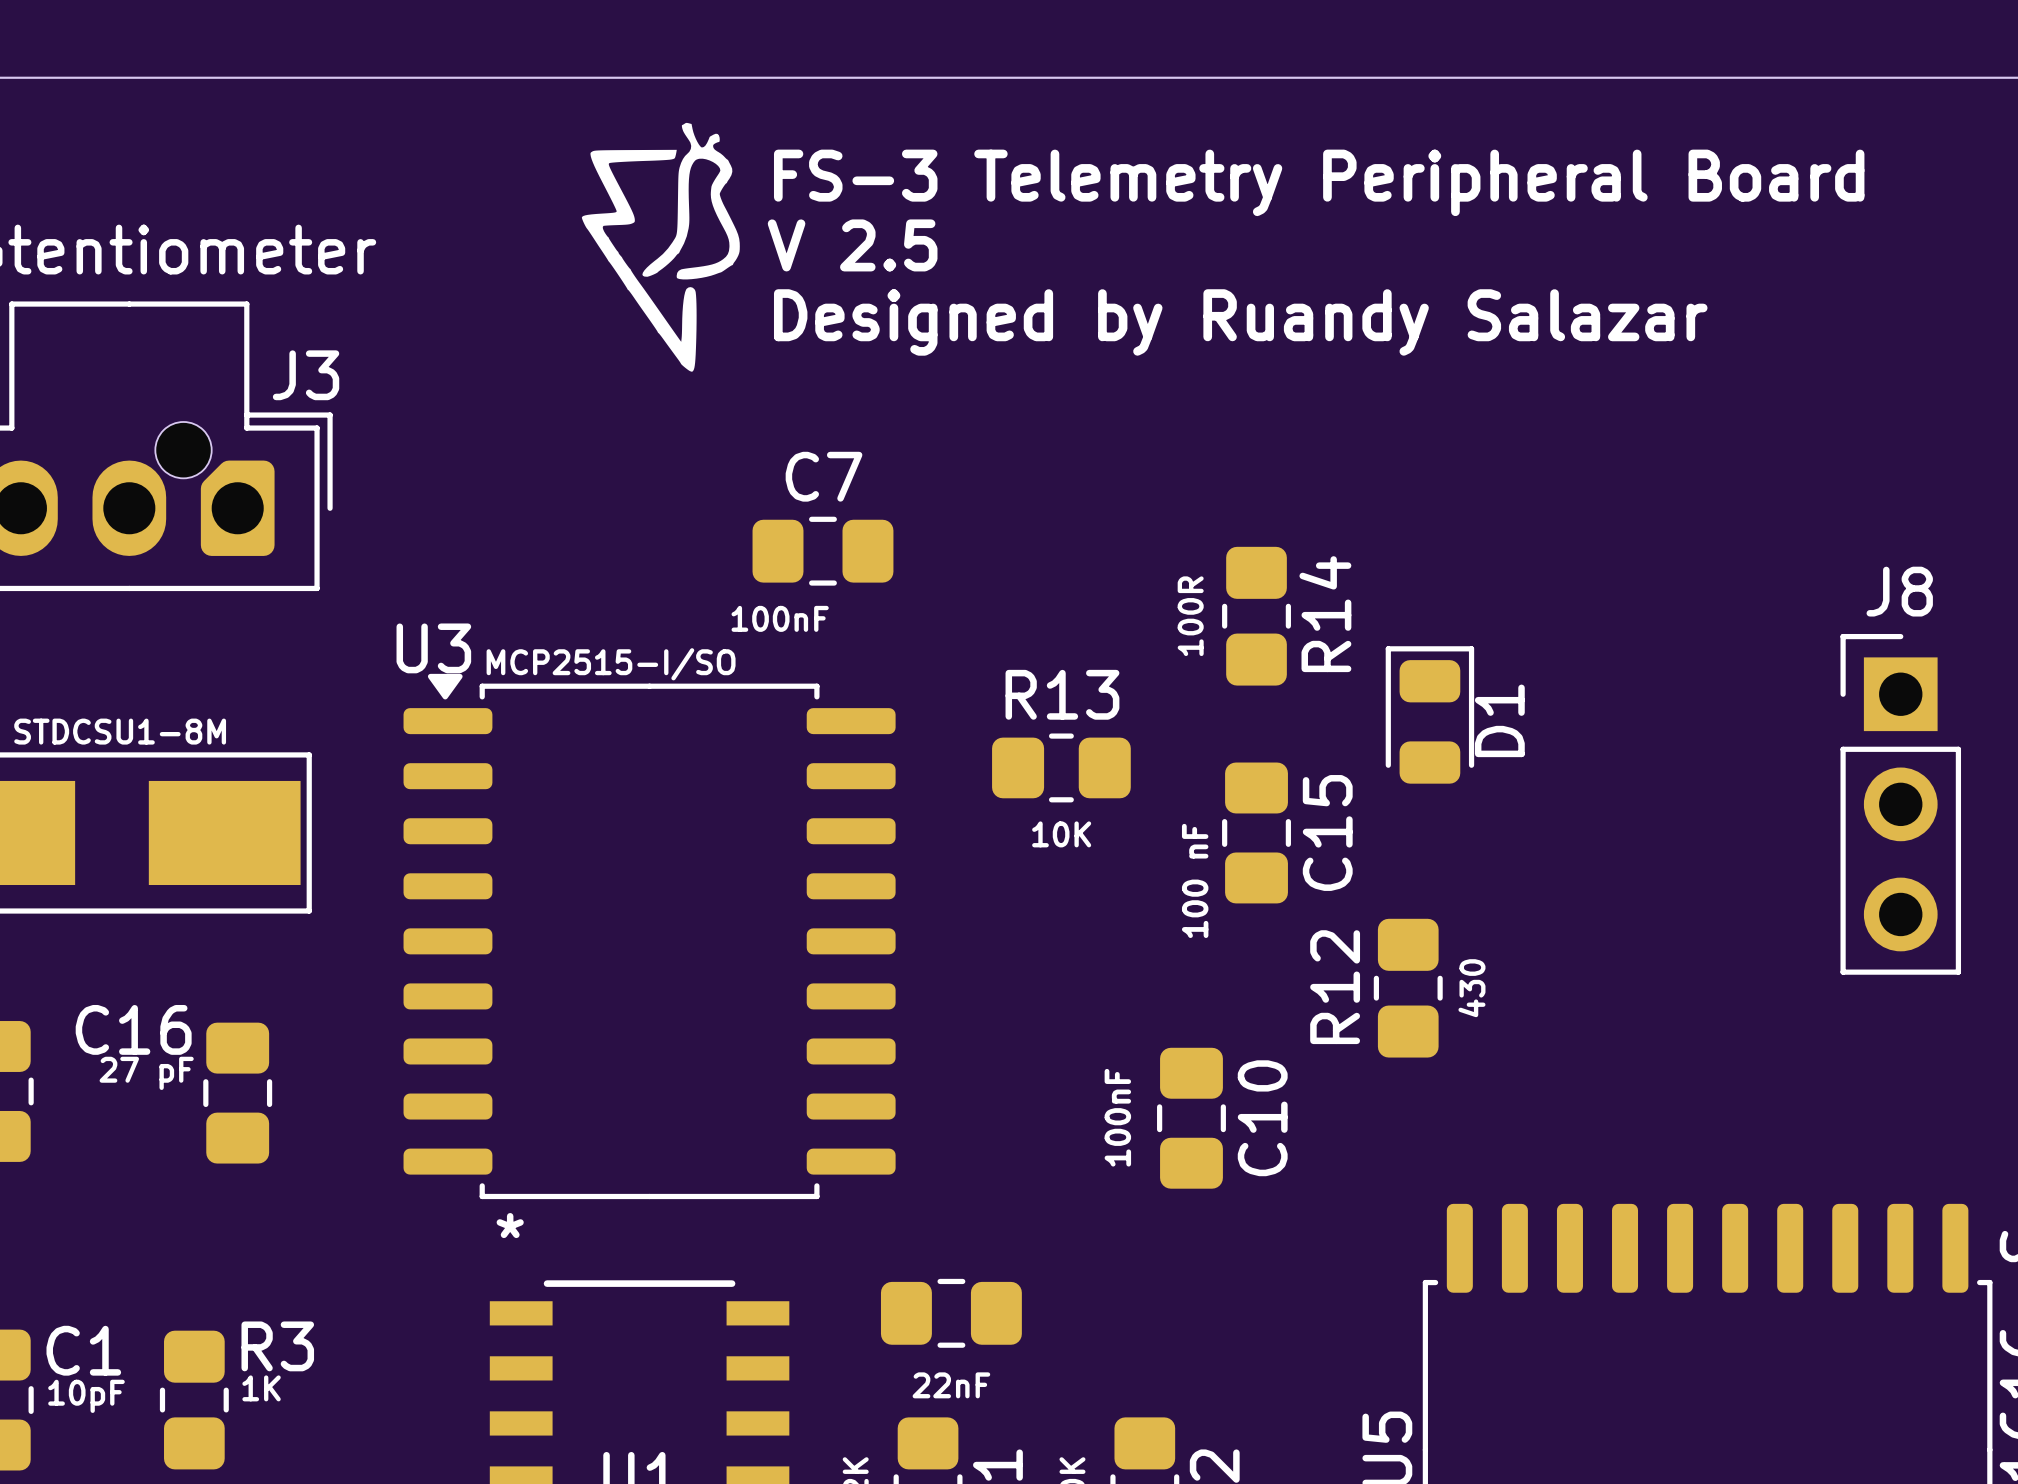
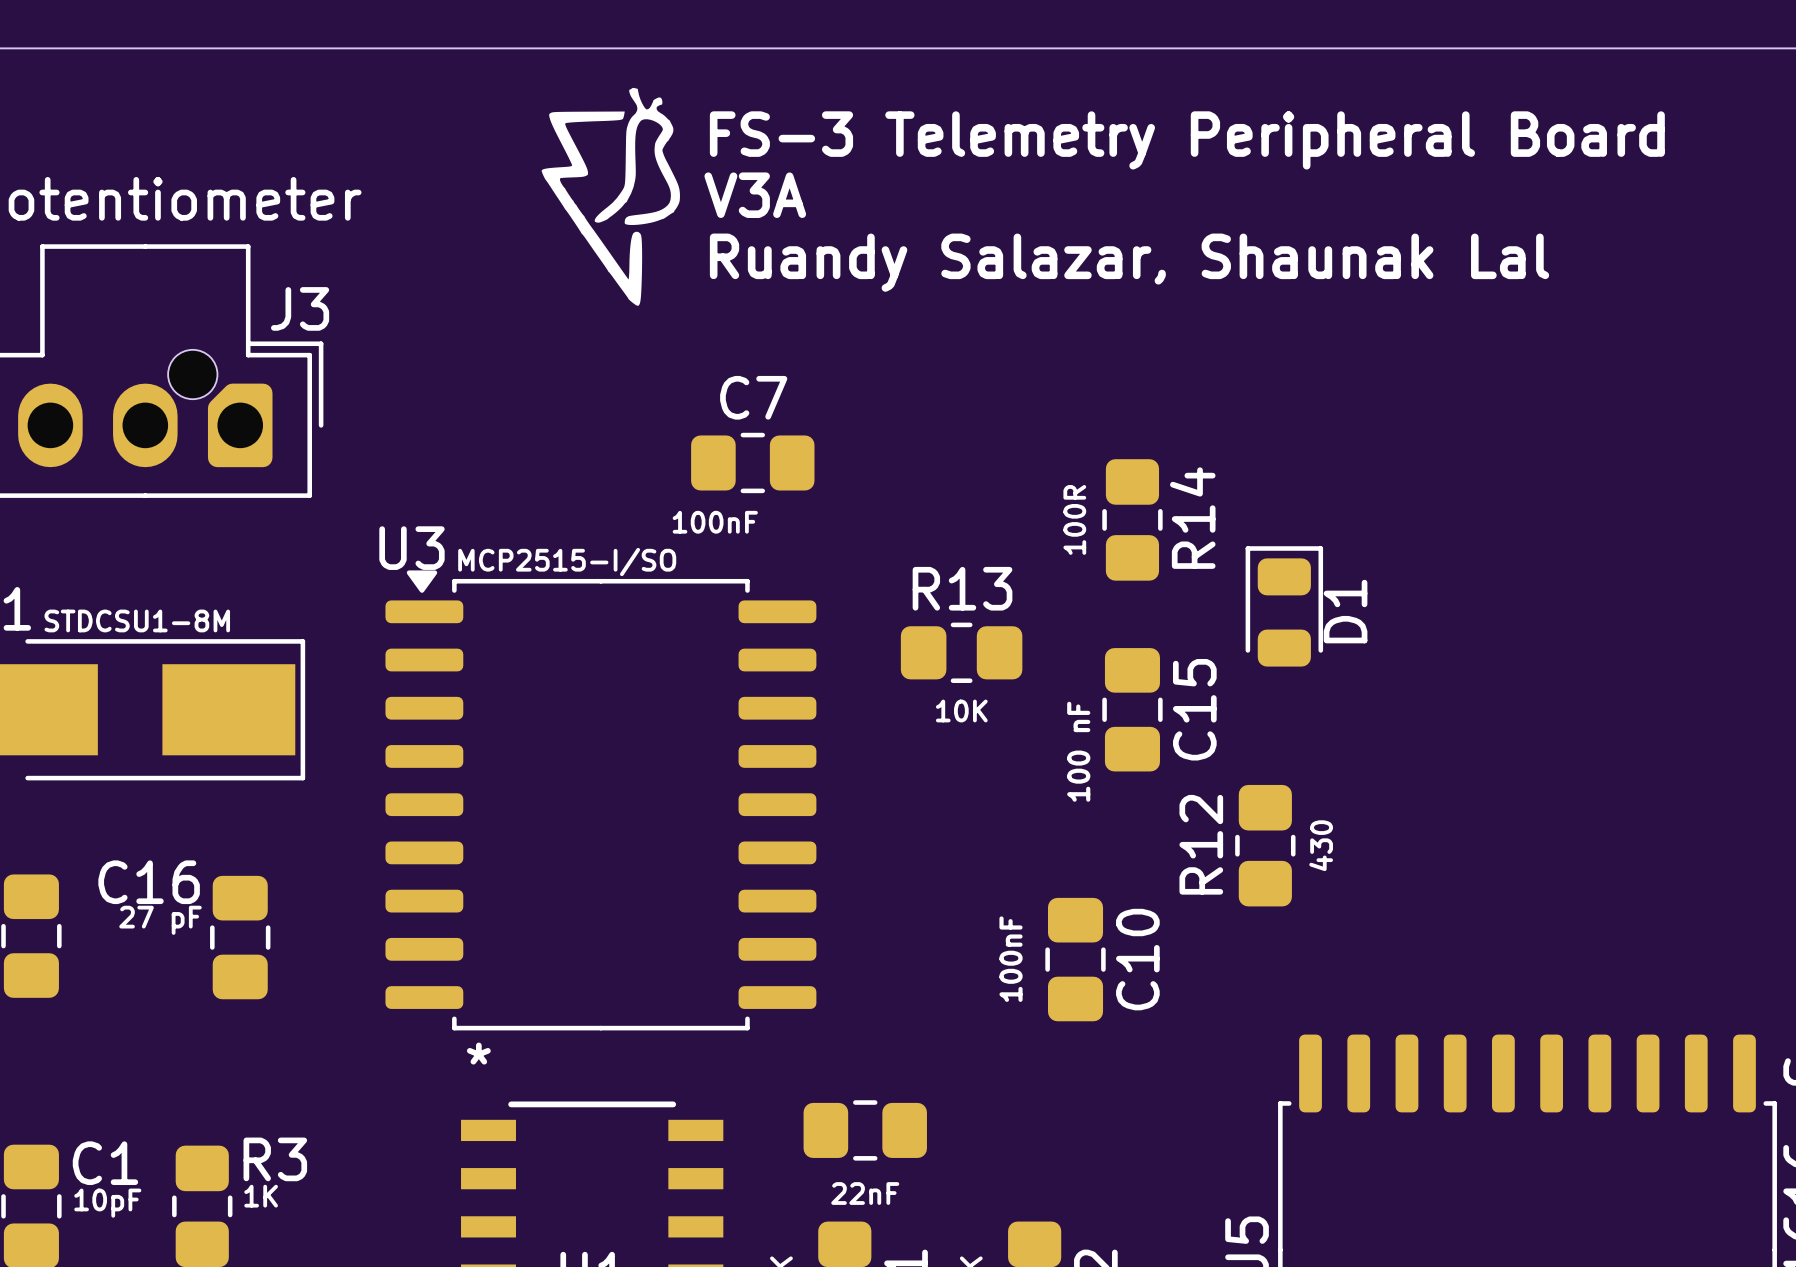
text: V 2.5 (852, 245) -> V3A (755, 195)
text: Designed by Ruandy Salazar (1240, 322) -> Ruandy Salazar, Shaunak Lal (1129, 262)
J8: (1900, 804) -> none

